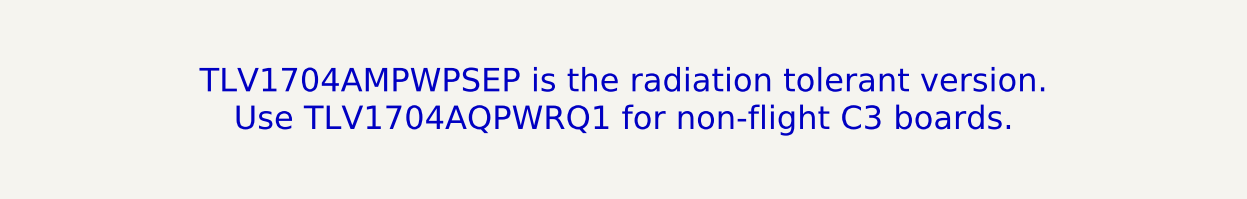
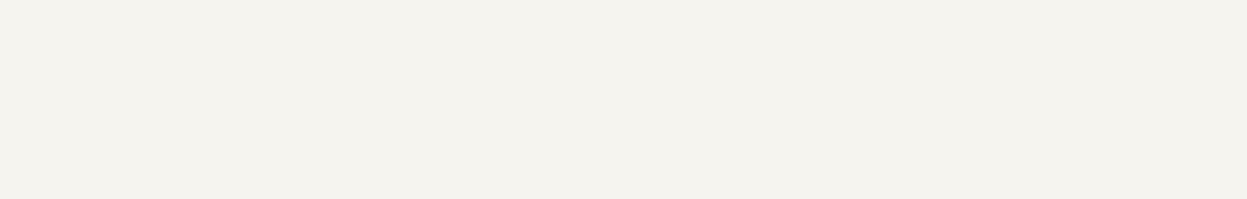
text: TLV1704AMPWPSEP is the radiation tolerant version. (621, 79) -> none
text: Use TLV1704AQPWRQ1 for non-flight C3 boards. (623, 120) -> none

